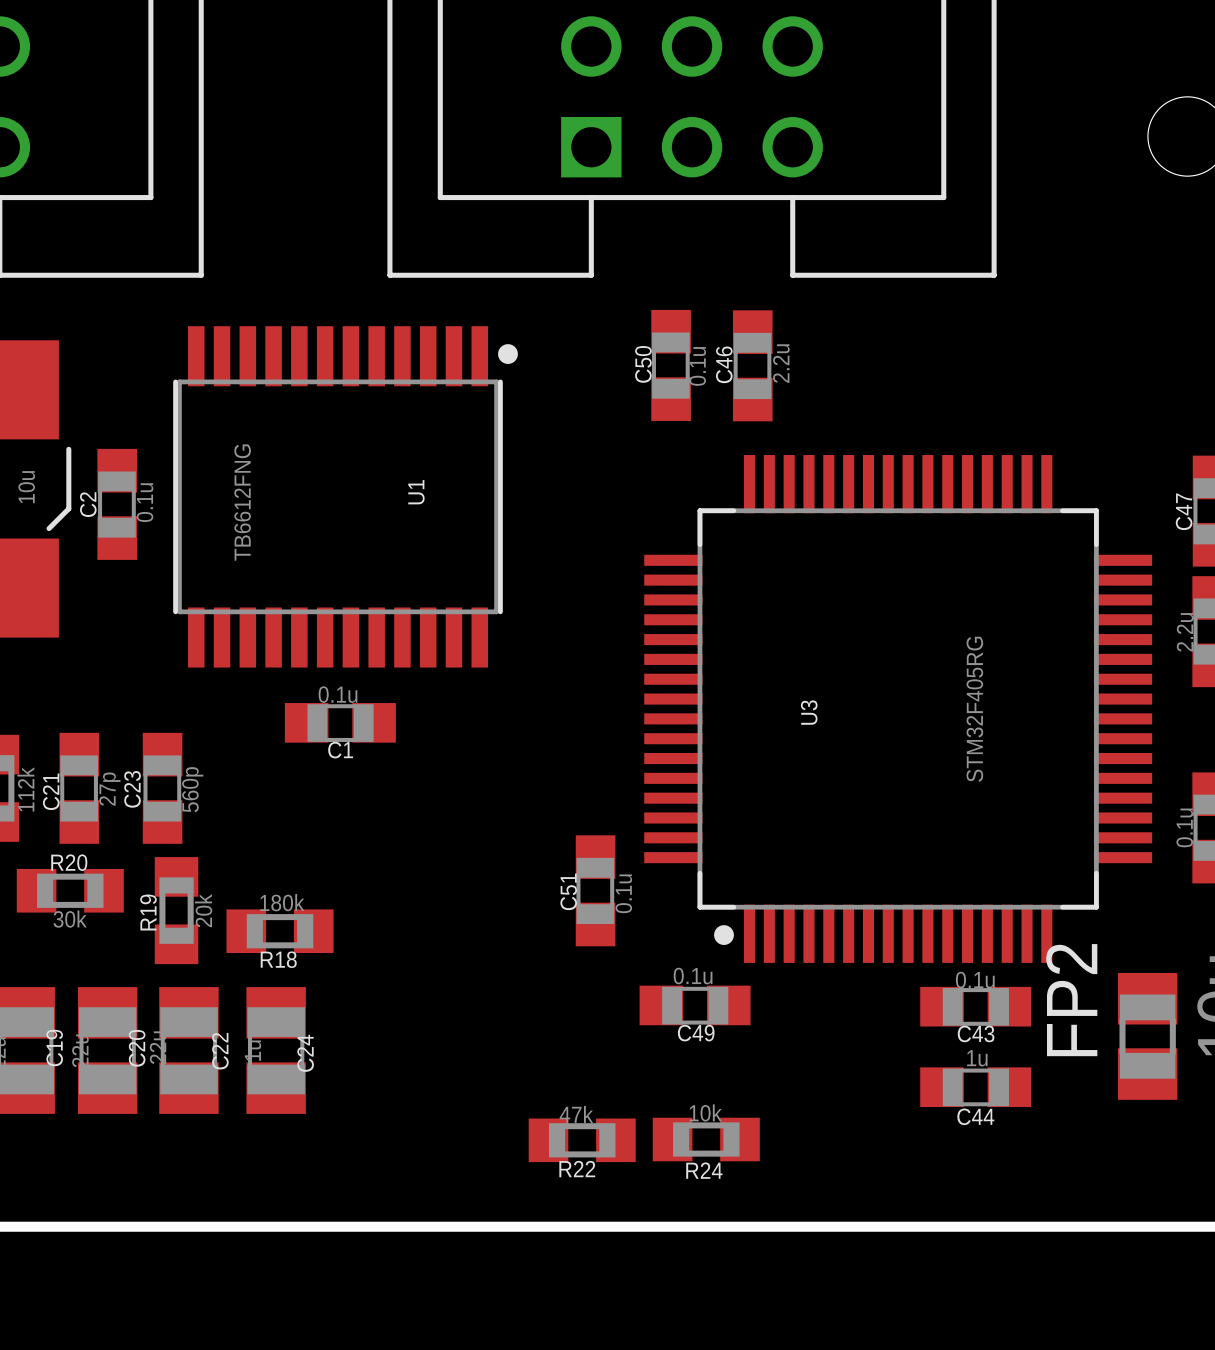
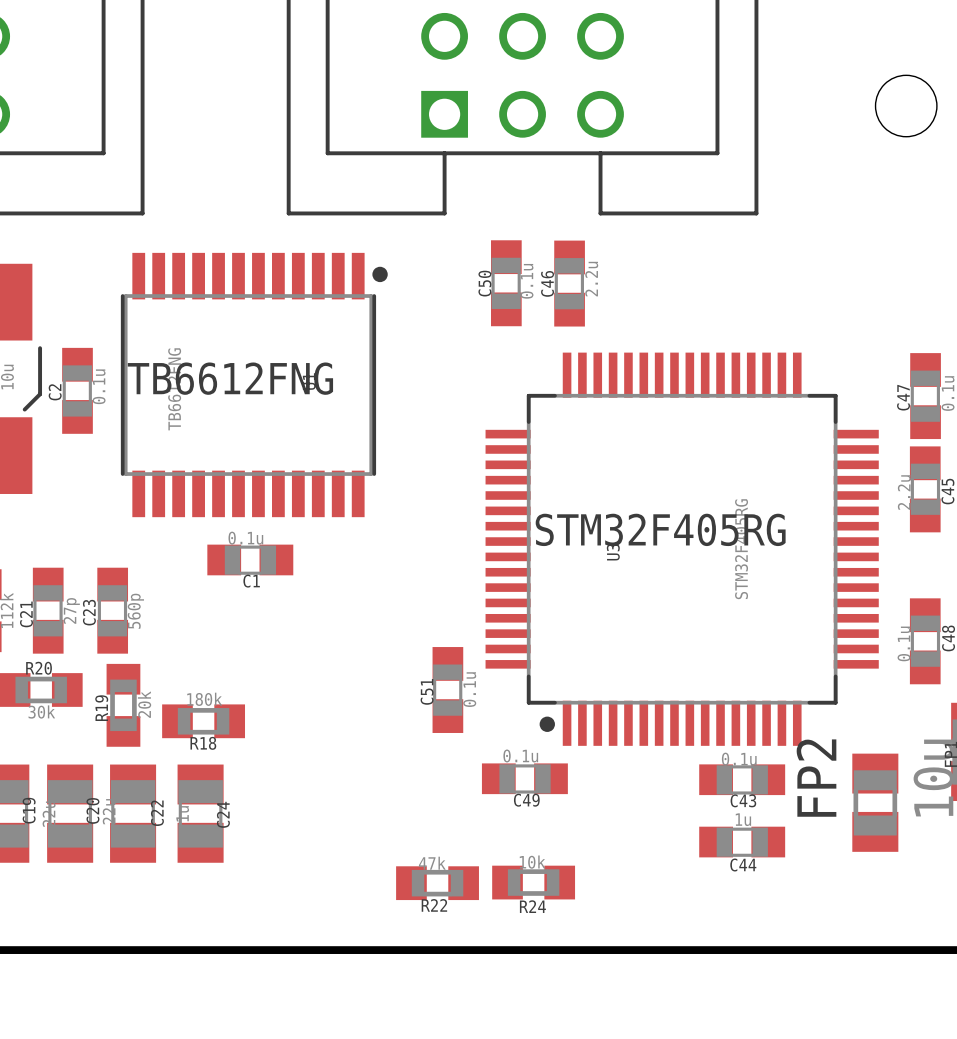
text: none -> TB6612FNG (230, 378)
text: none -> STM32F405RG (660, 529)

